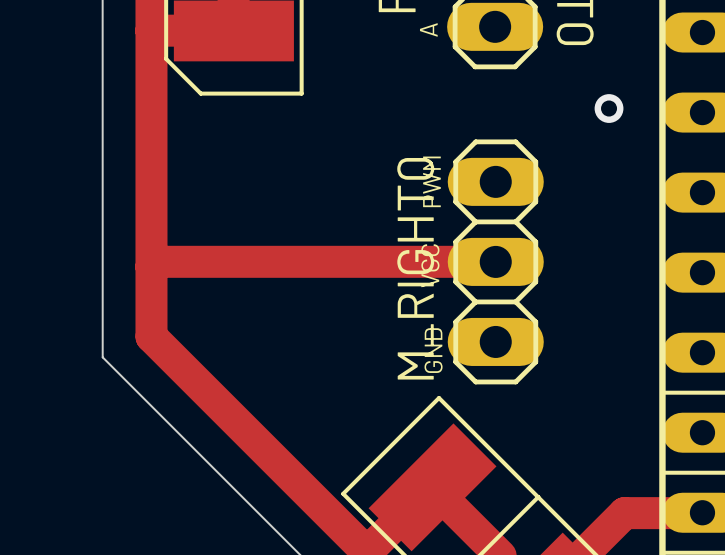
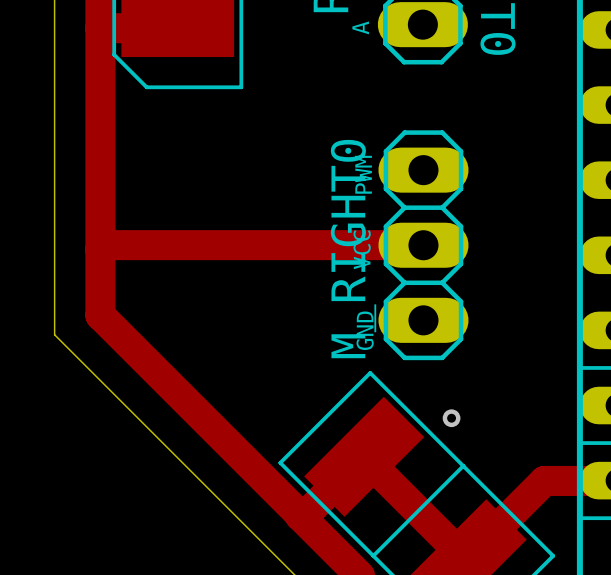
via: (609, 108) -> none
via: none -> (451, 418)

